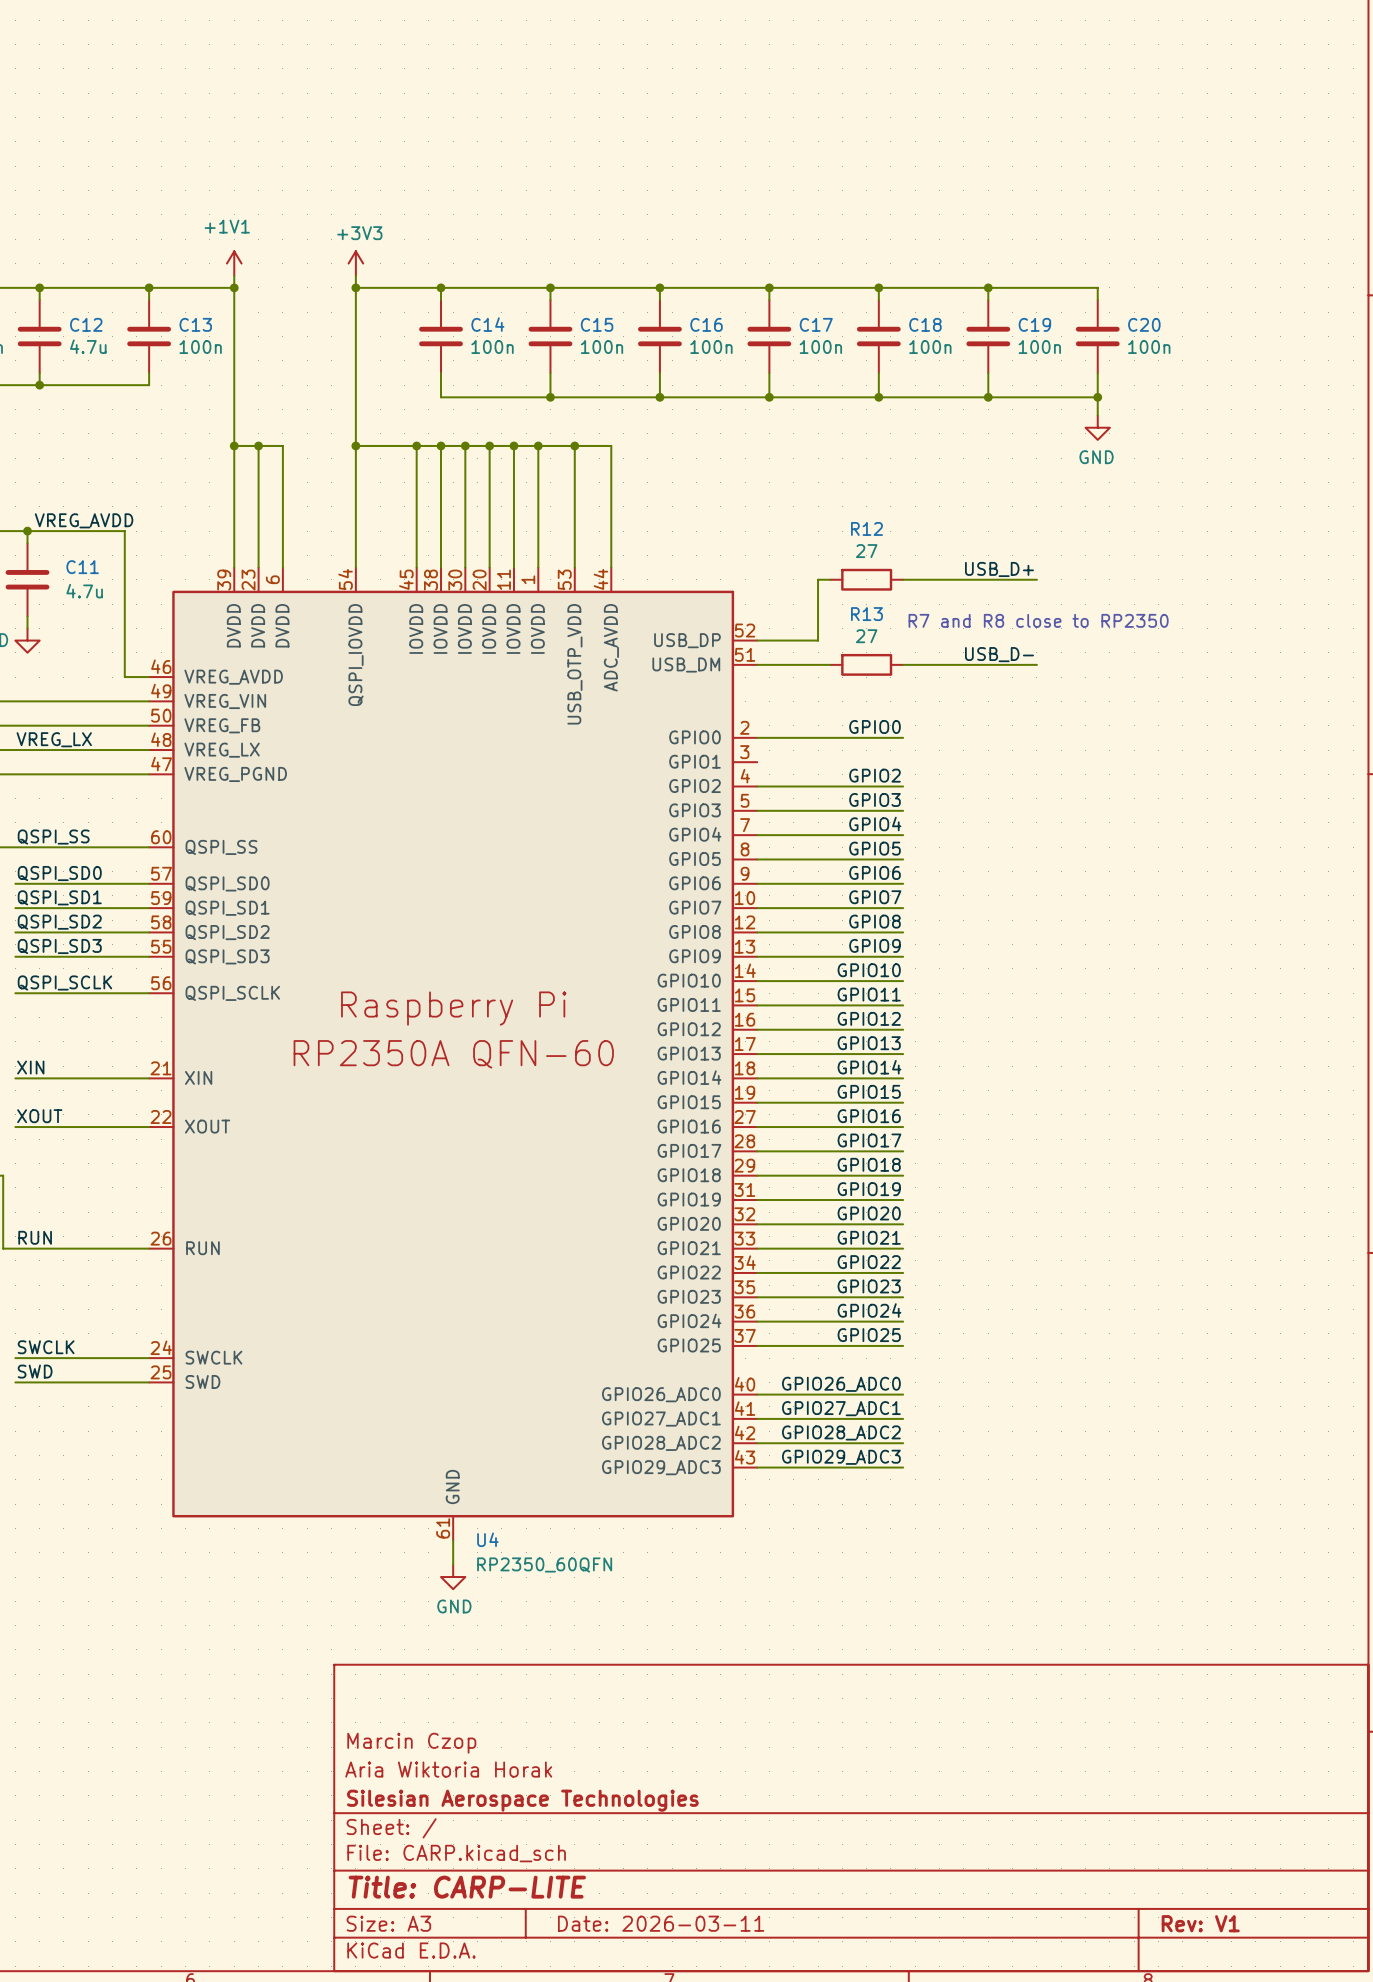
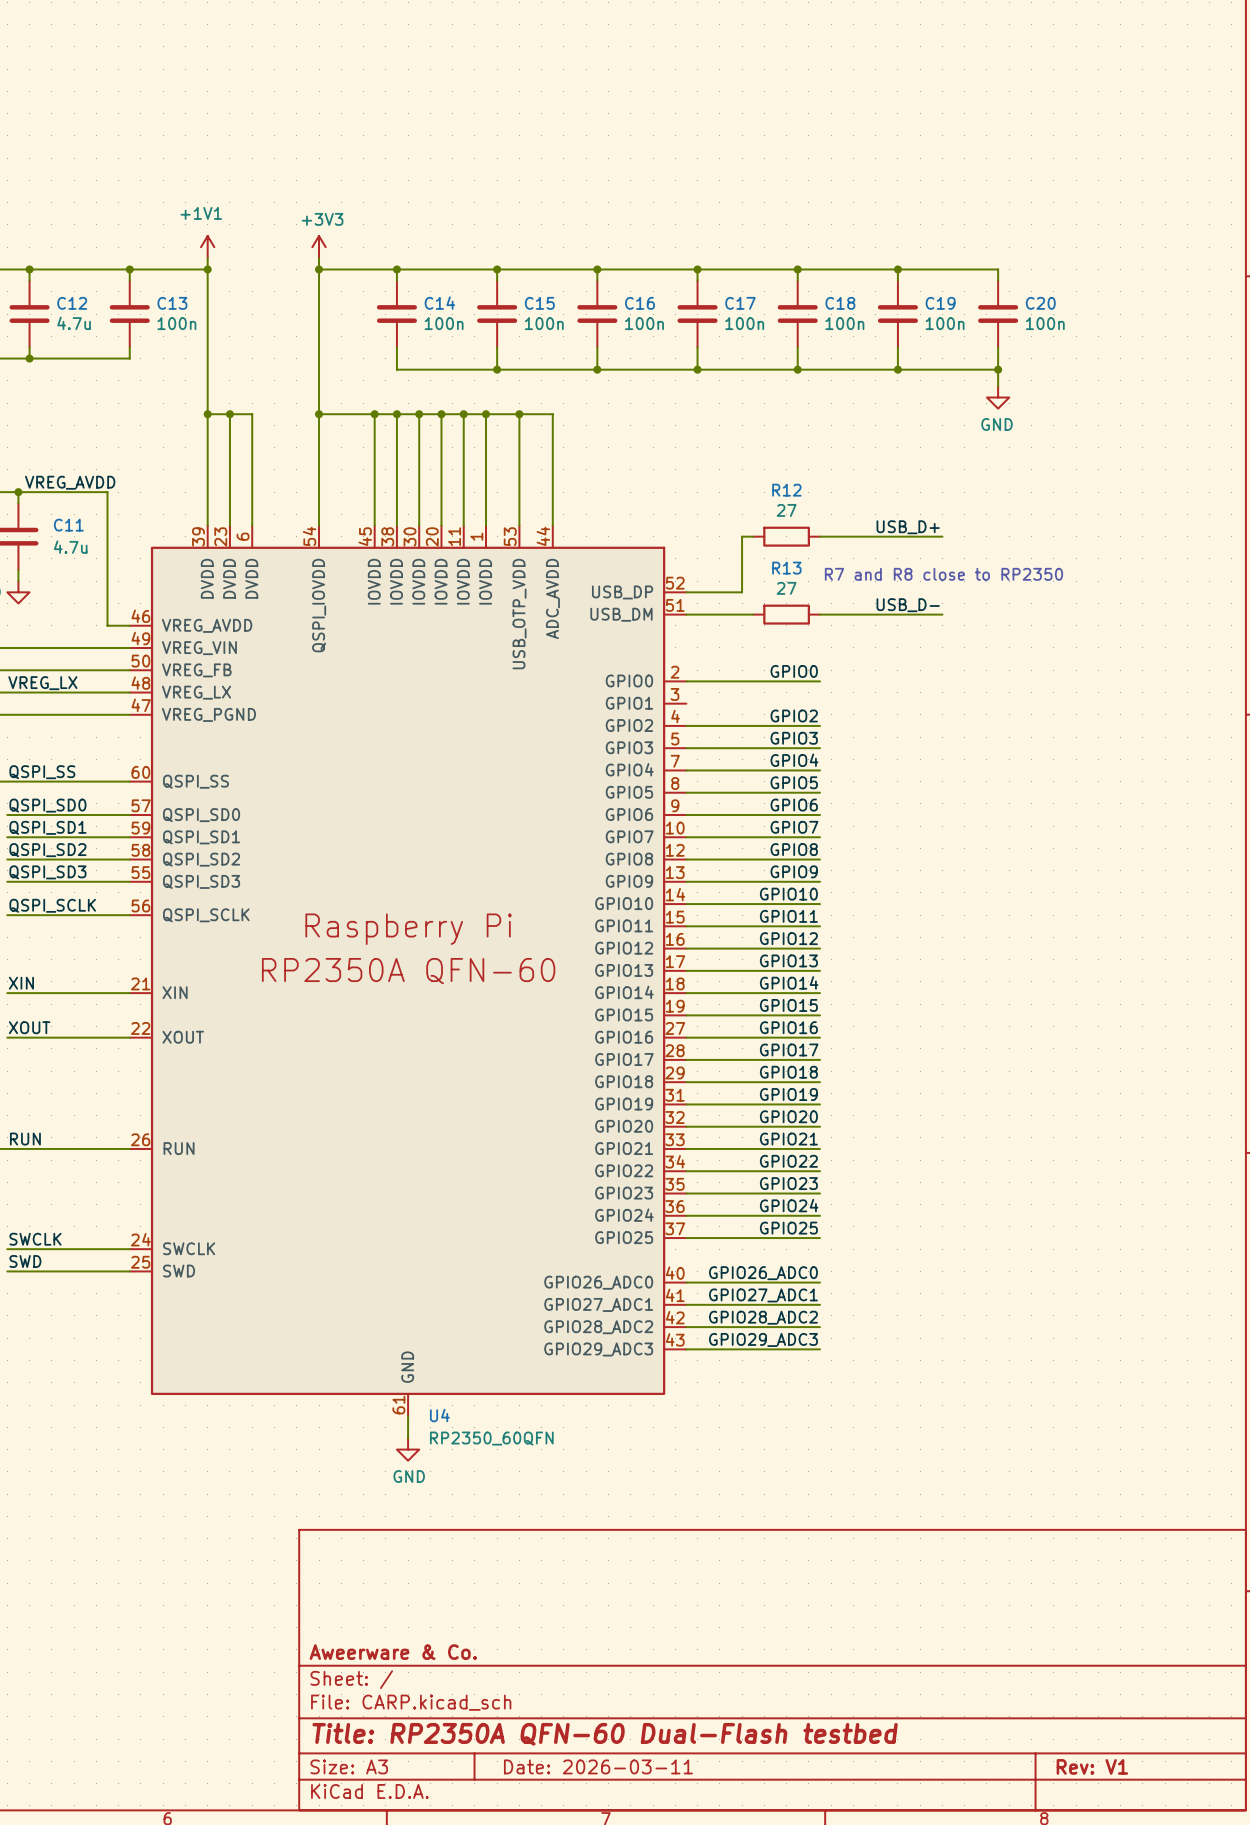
title block: Marcin Czop (411, 1743) -> none
title block: Aria Wiktoria Horak (448, 1769) -> none
title block: Silesian Aerospace Technologies (522, 1800) -> Aweerware & Co. (393, 1652)
title block: Title: CARP-LITE (467, 1887) -> Title: RP2350A QFN-60 Dual-Flash testbed (605, 1734)

